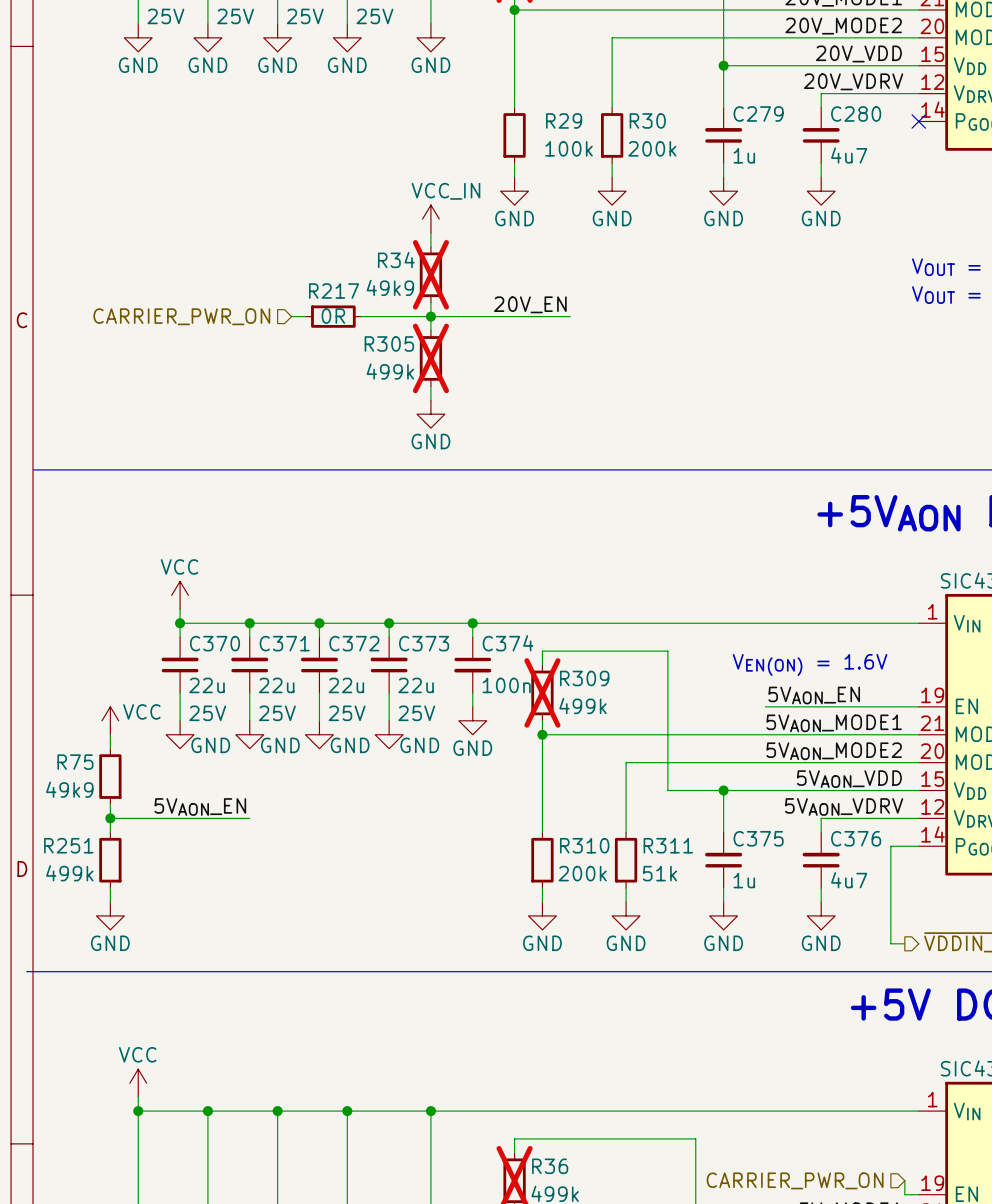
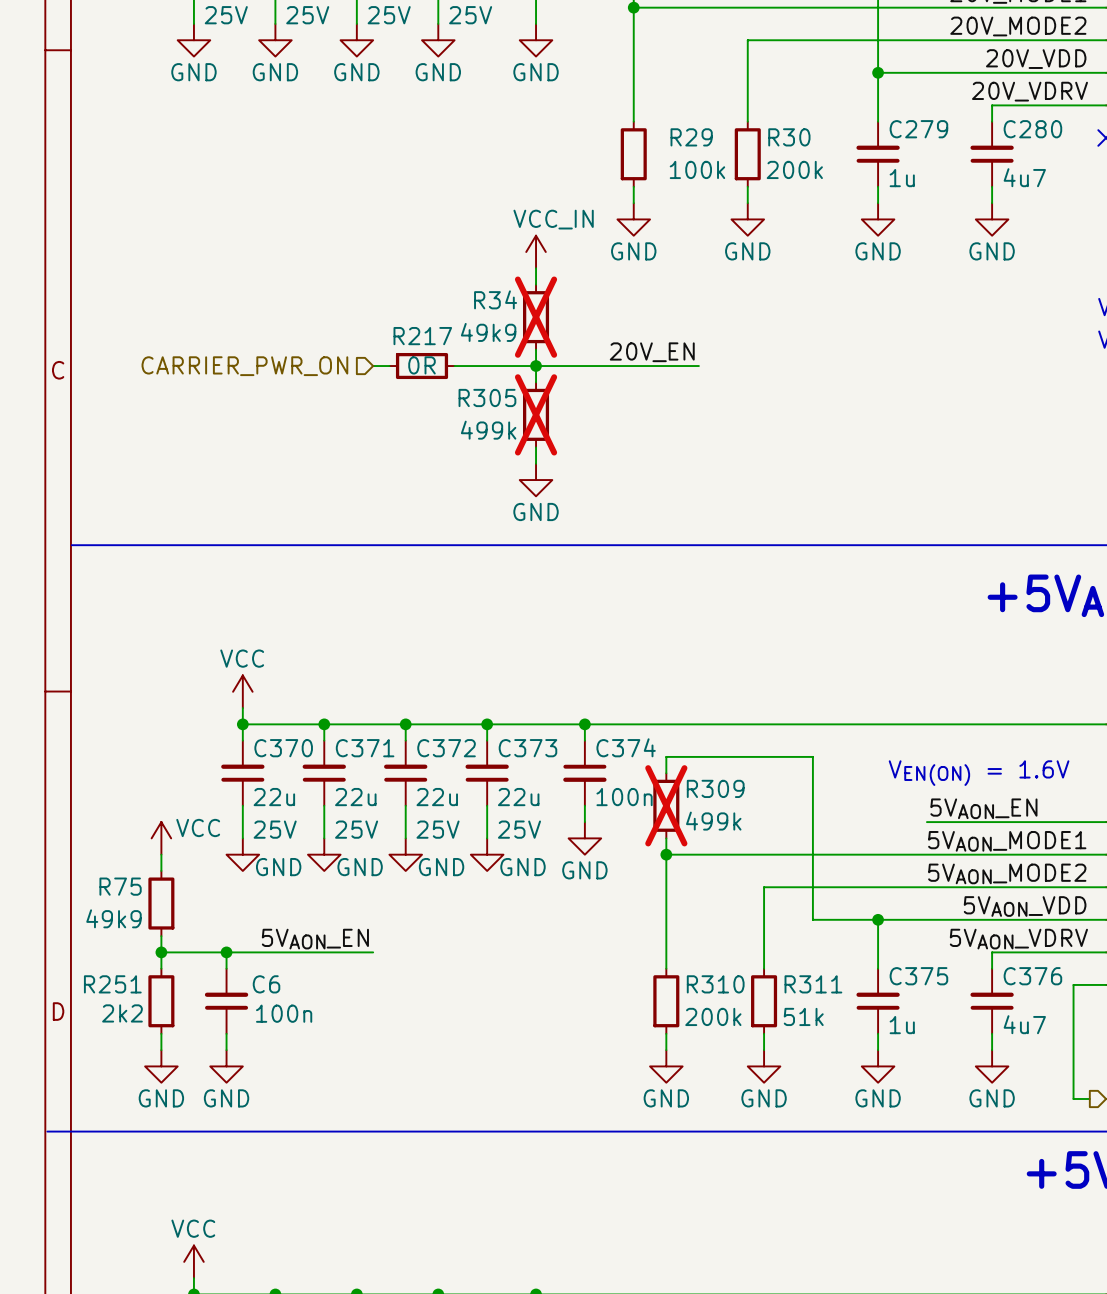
label position: 5VAON_EN (200, 806) -> 5VAON_EN (315, 939)
wire: none -> (226, 952) (226, 968)
junction: none -> (226, 952)
wire: none -> (324, 952) (373, 952)
C6: none -> (226, 1001)
R251 text: 499k (69, 873) -> 2k2 (122, 1013)
wire: none -> (226, 1033) (226, 1050)
power symbol: none -> GND (226, 1066)
line: none -> (47, 1131) (63, 1131)

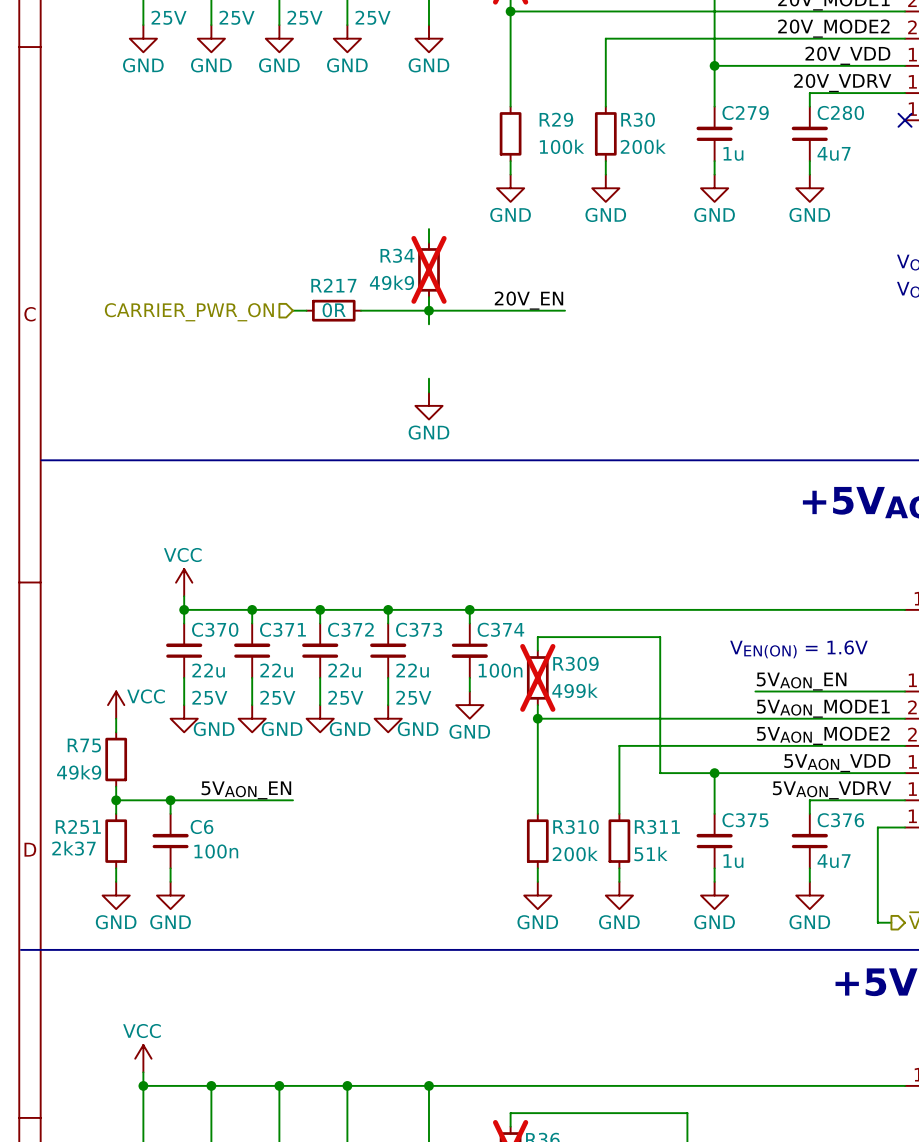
power symbol: VCC_IN (536, 251) -> none
R305: (536, 414) -> none
R251 text: 2k2 (122, 1013) -> 2k37 (73, 848)

